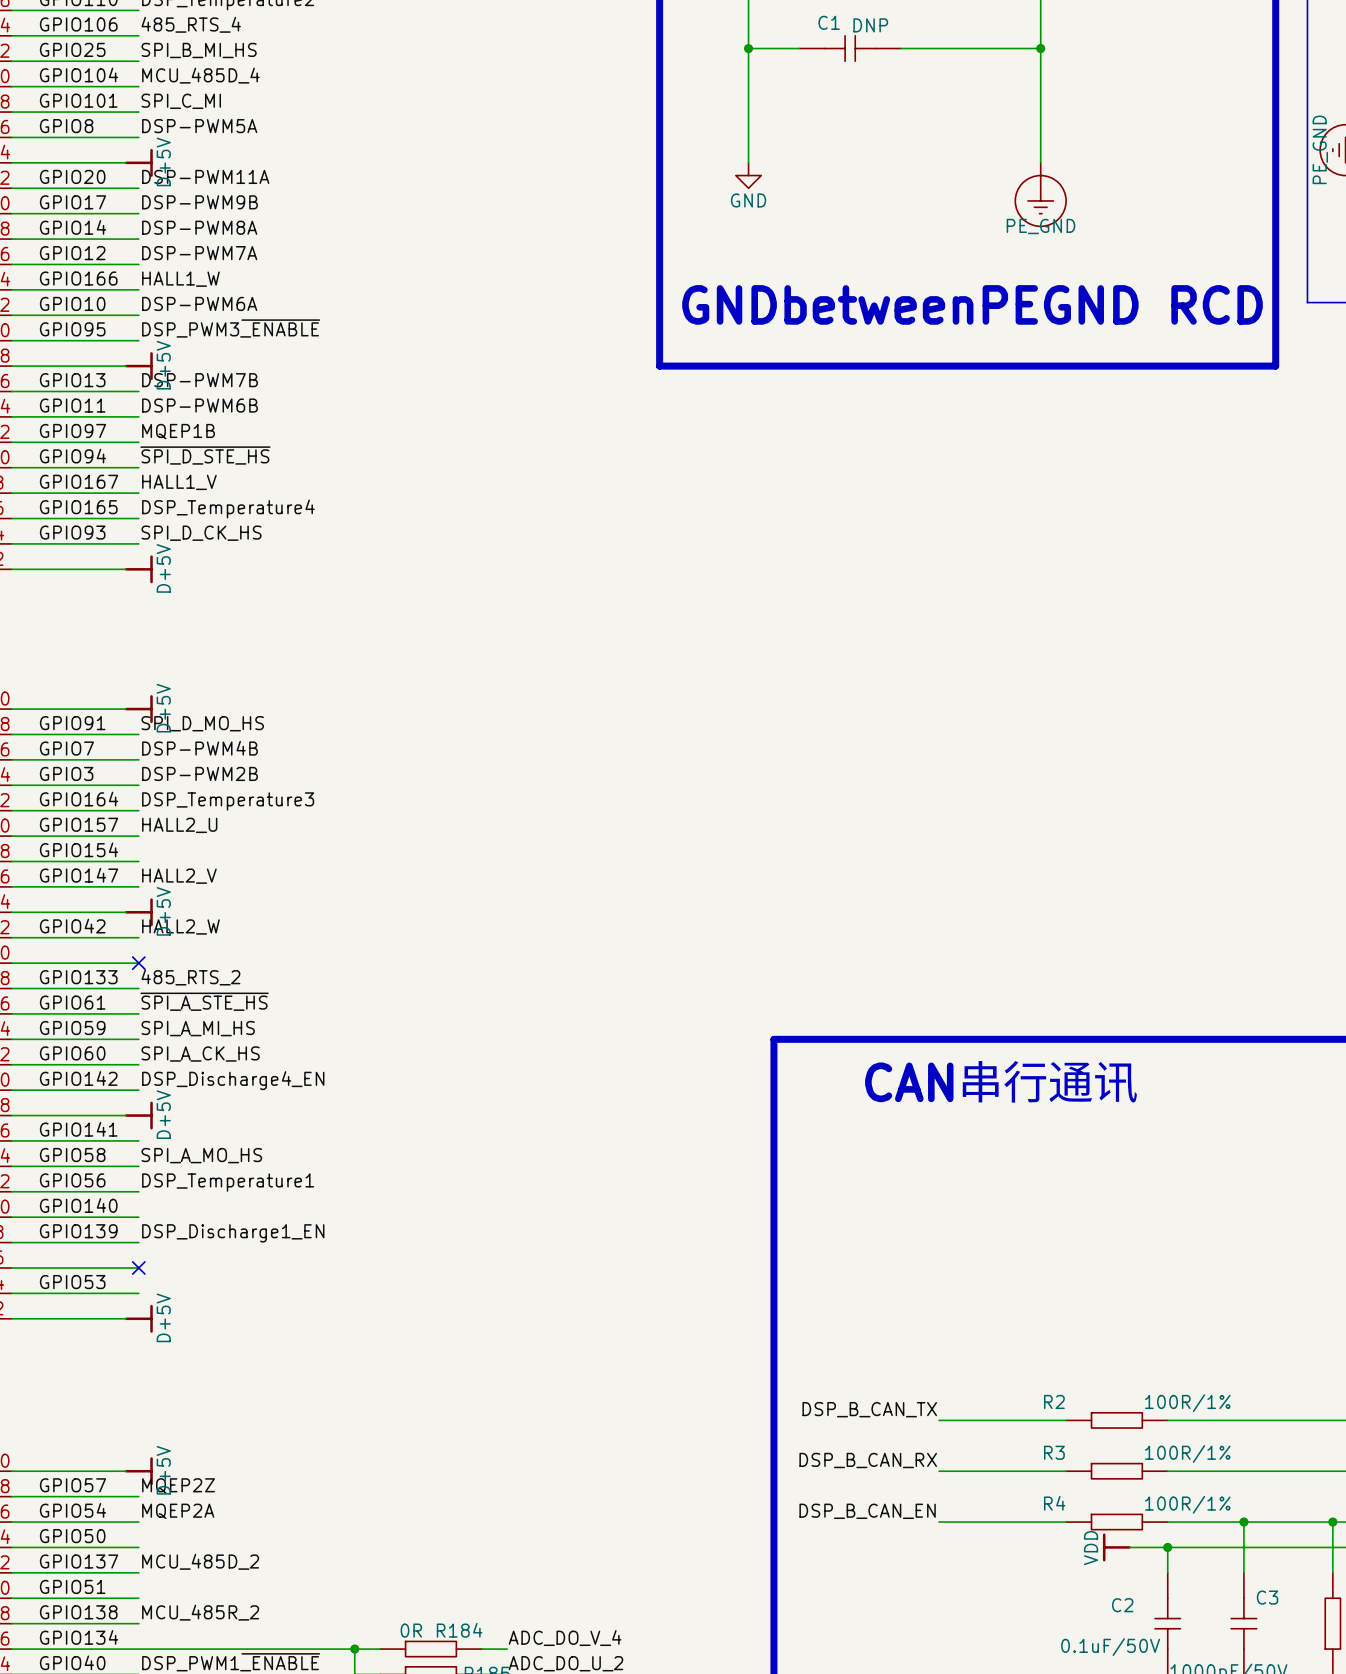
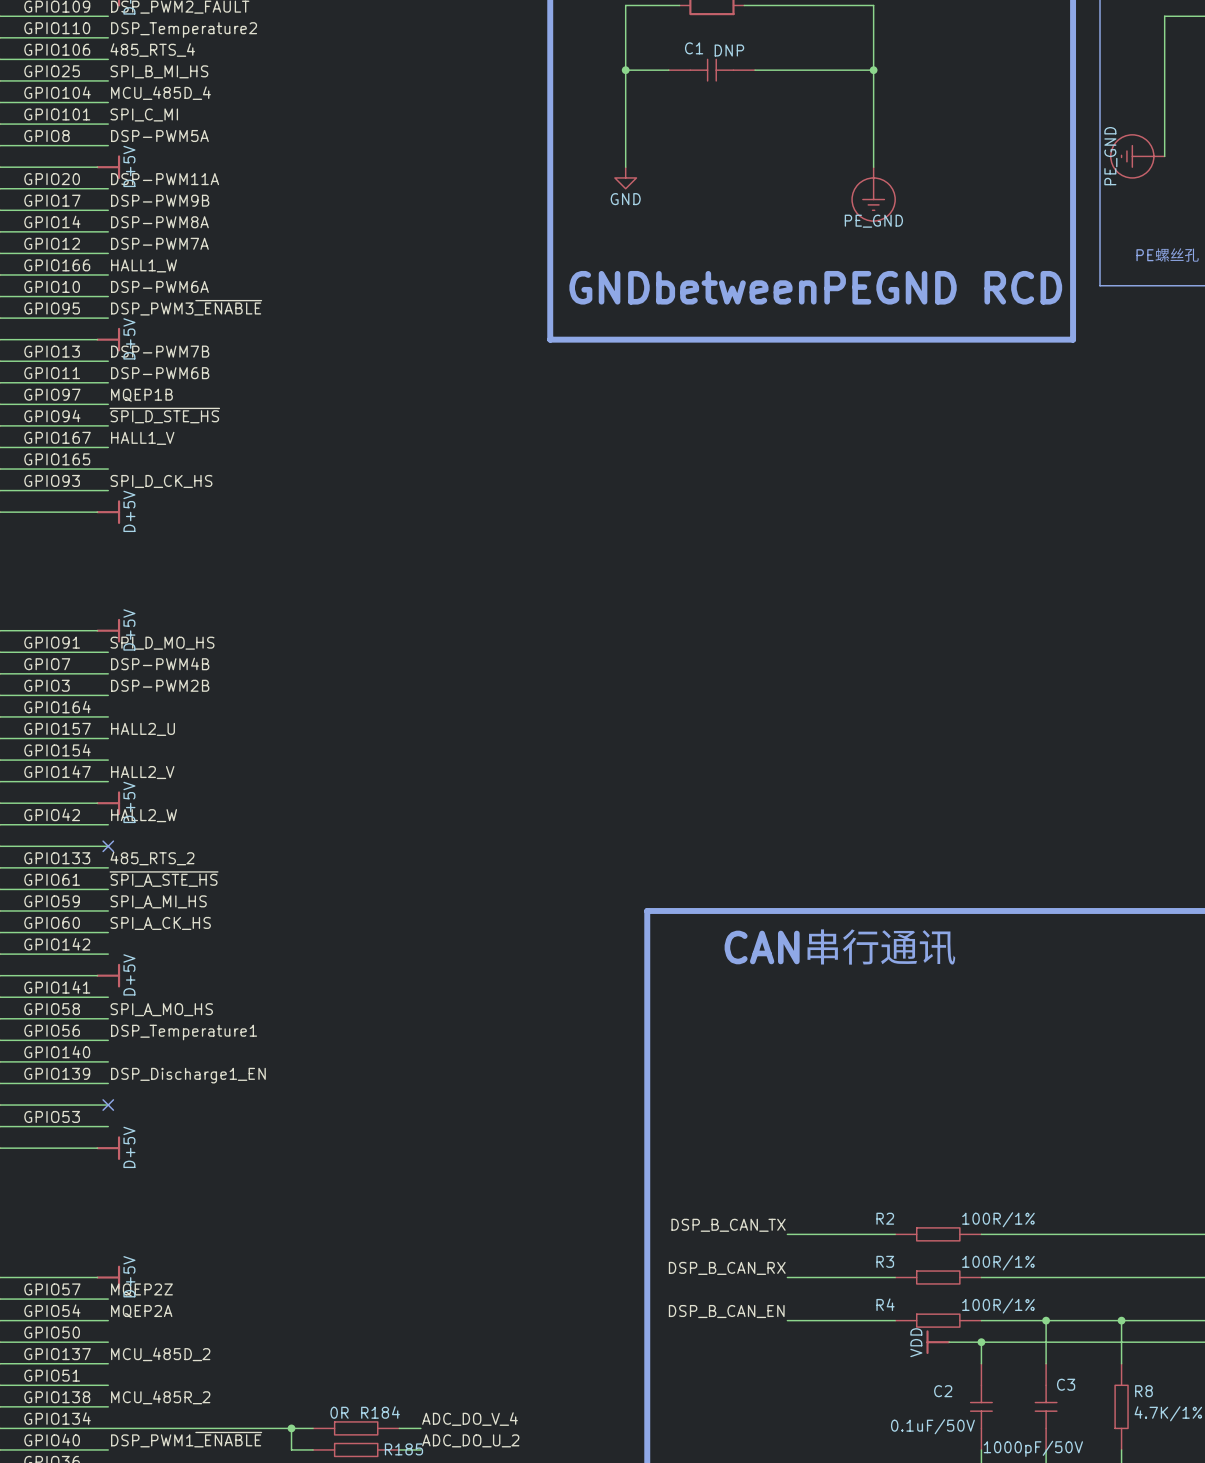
label: DSP_Temperature4 (228, 509) -> none
label: DSP_Temperature3 (228, 801) -> none
label: DSP_Discharge4_EN (233, 1080) -> none

